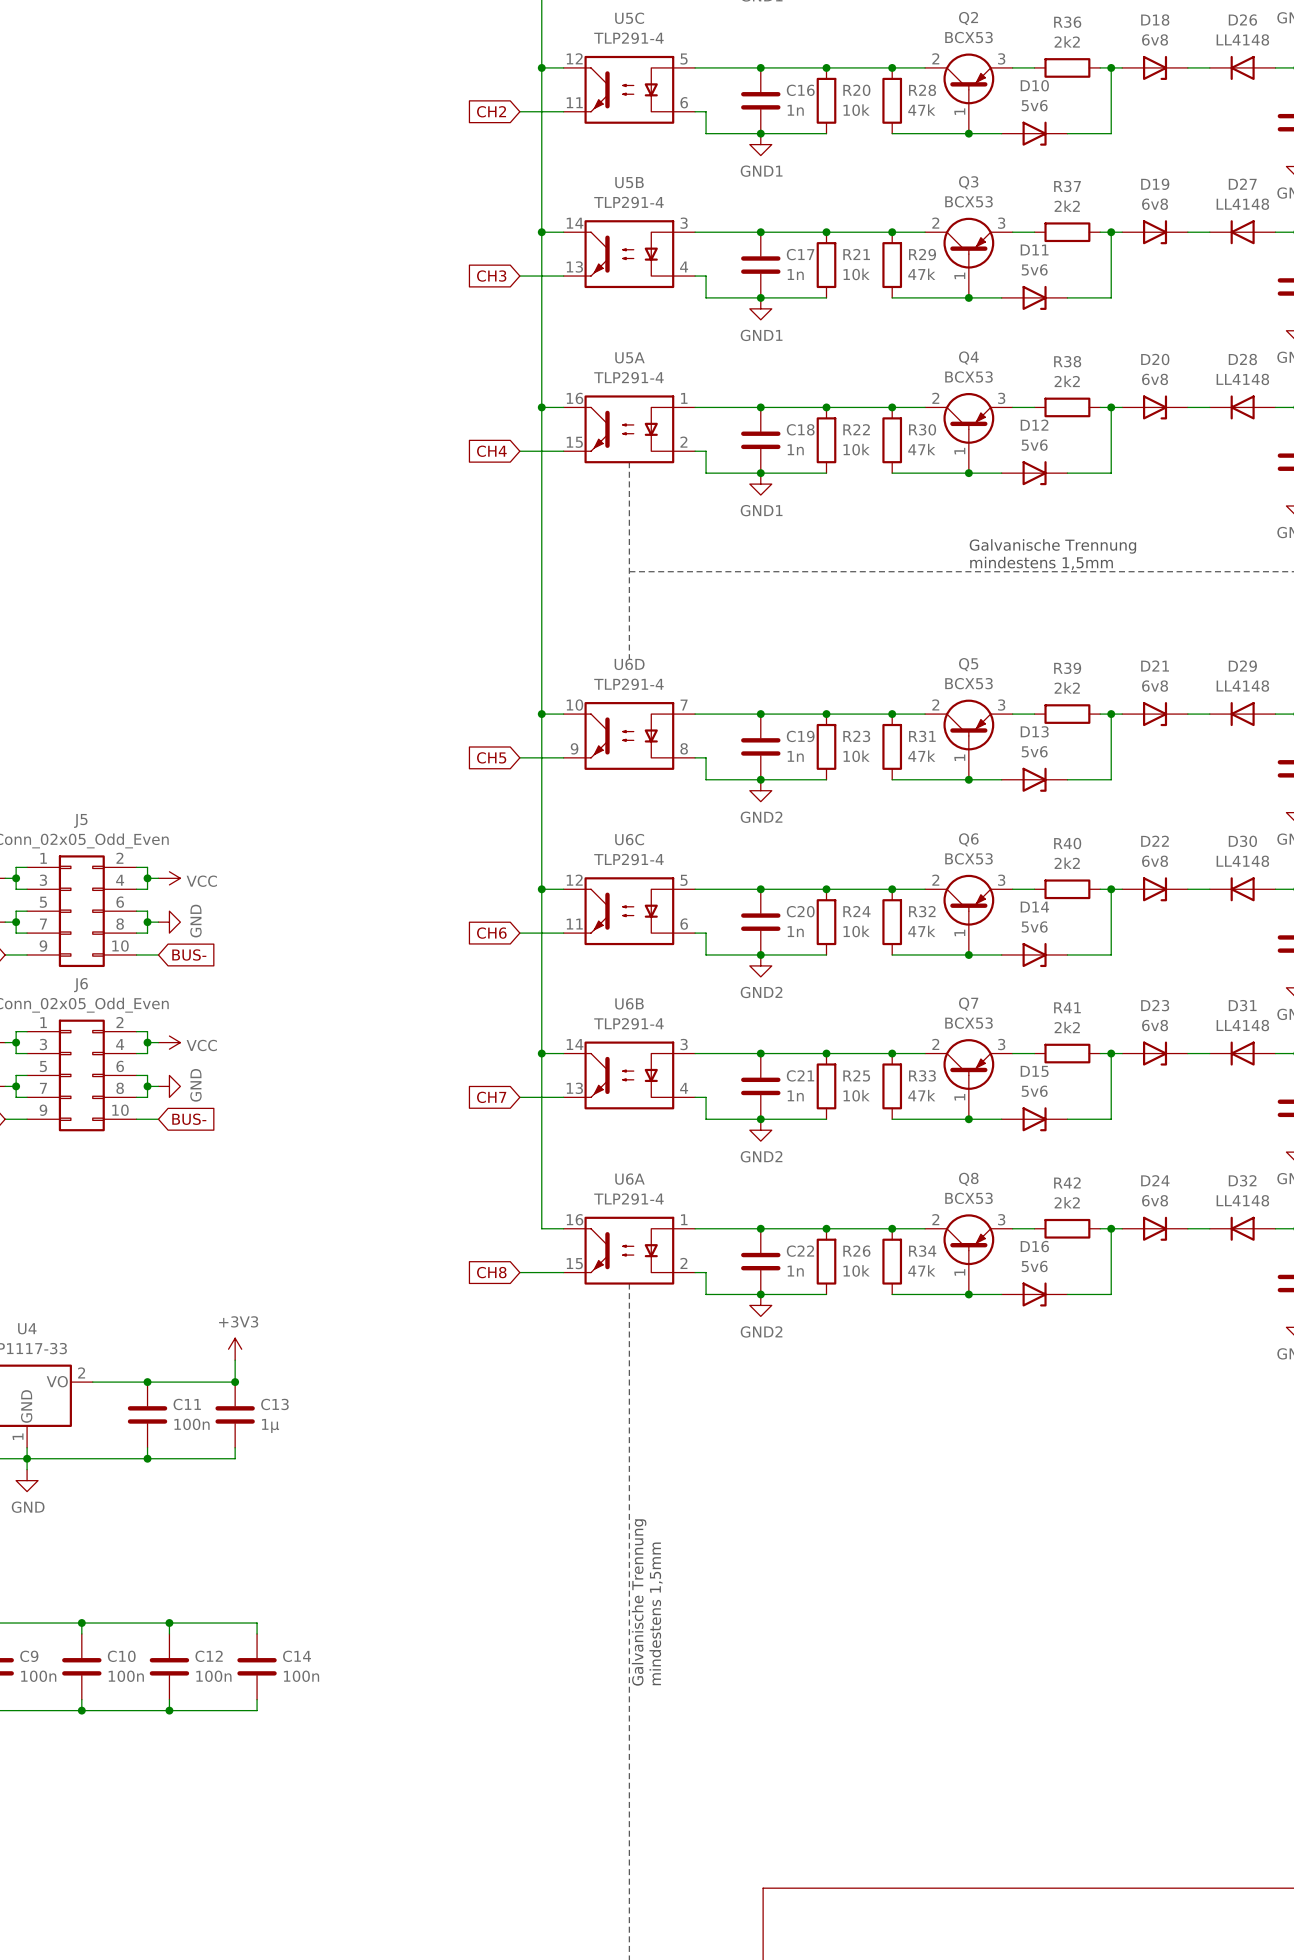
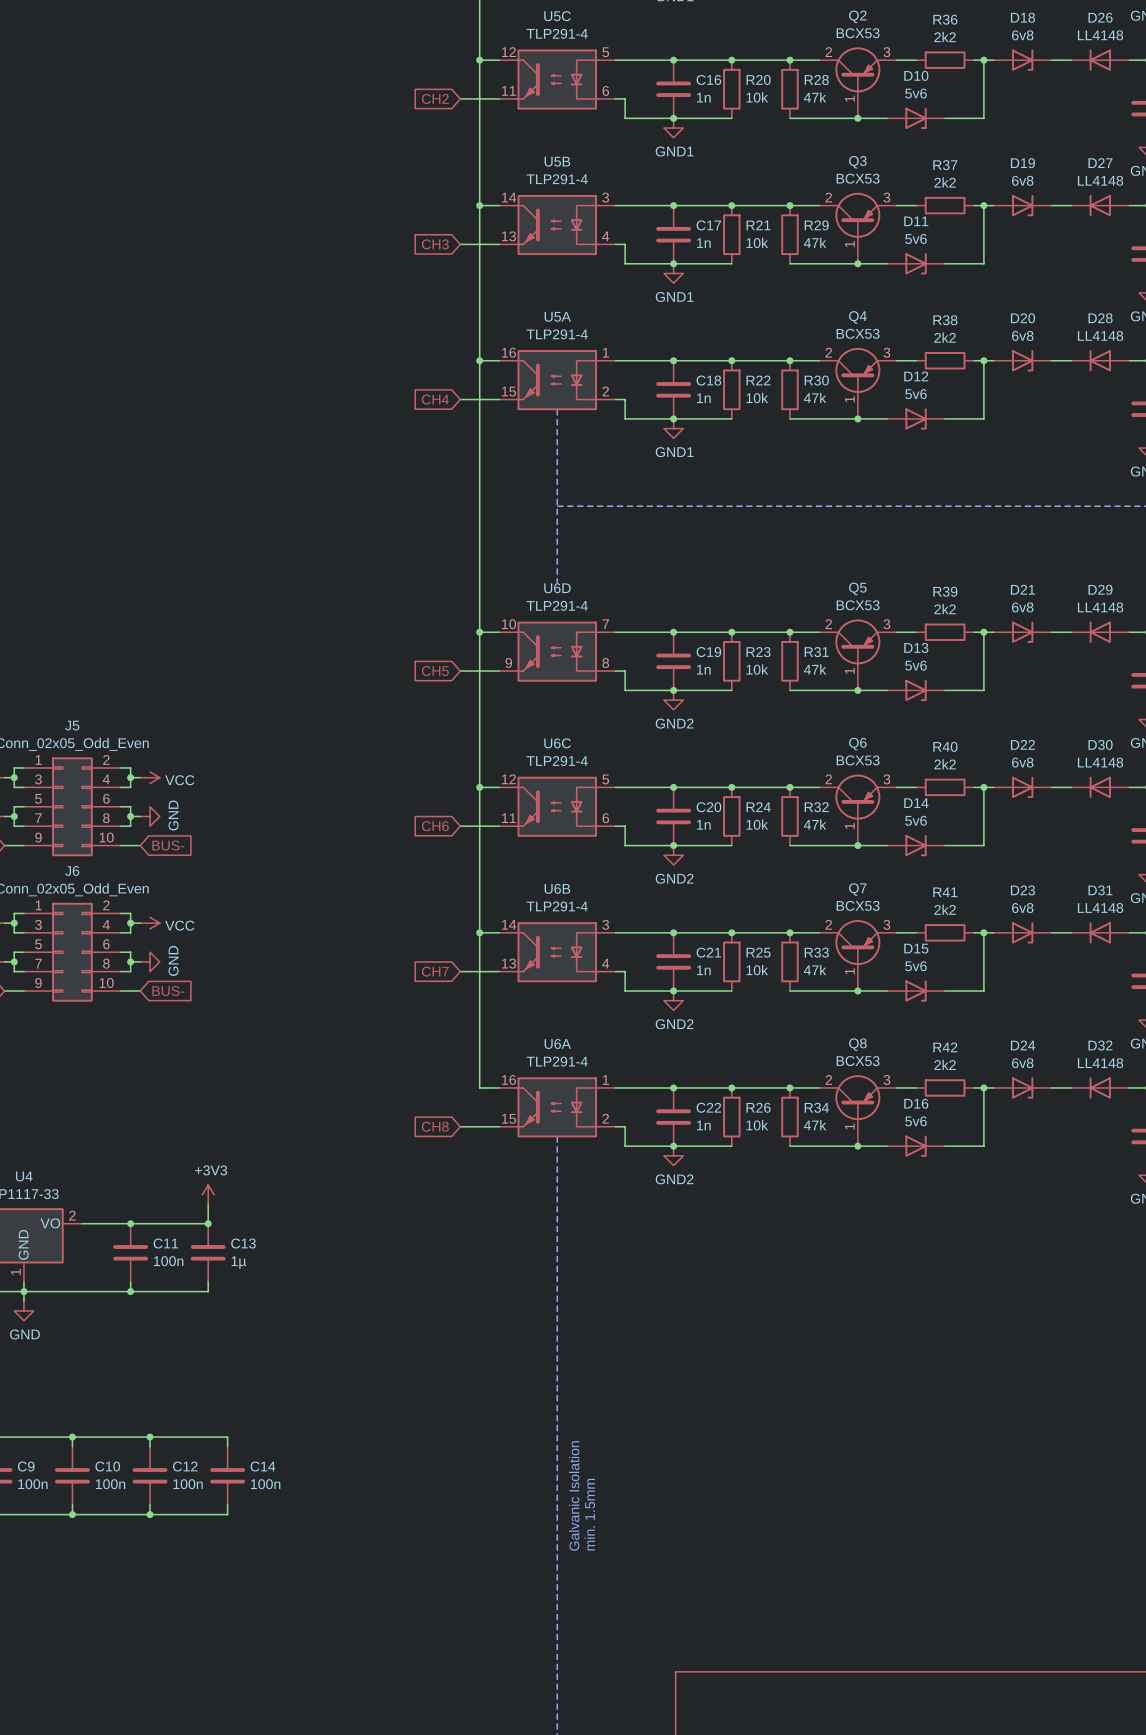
text: Galvanische Trennung (1052, 546) -> none
text: mindestens 1,5mm (1041, 563) -> none
text: Galvanische Trennung (639, 1602) -> none
text: mindestens 1,5mm (656, 1613) -> min. 1.5mm (589, 1514)
text: none -> Galvanic Isolation (574, 1495)

